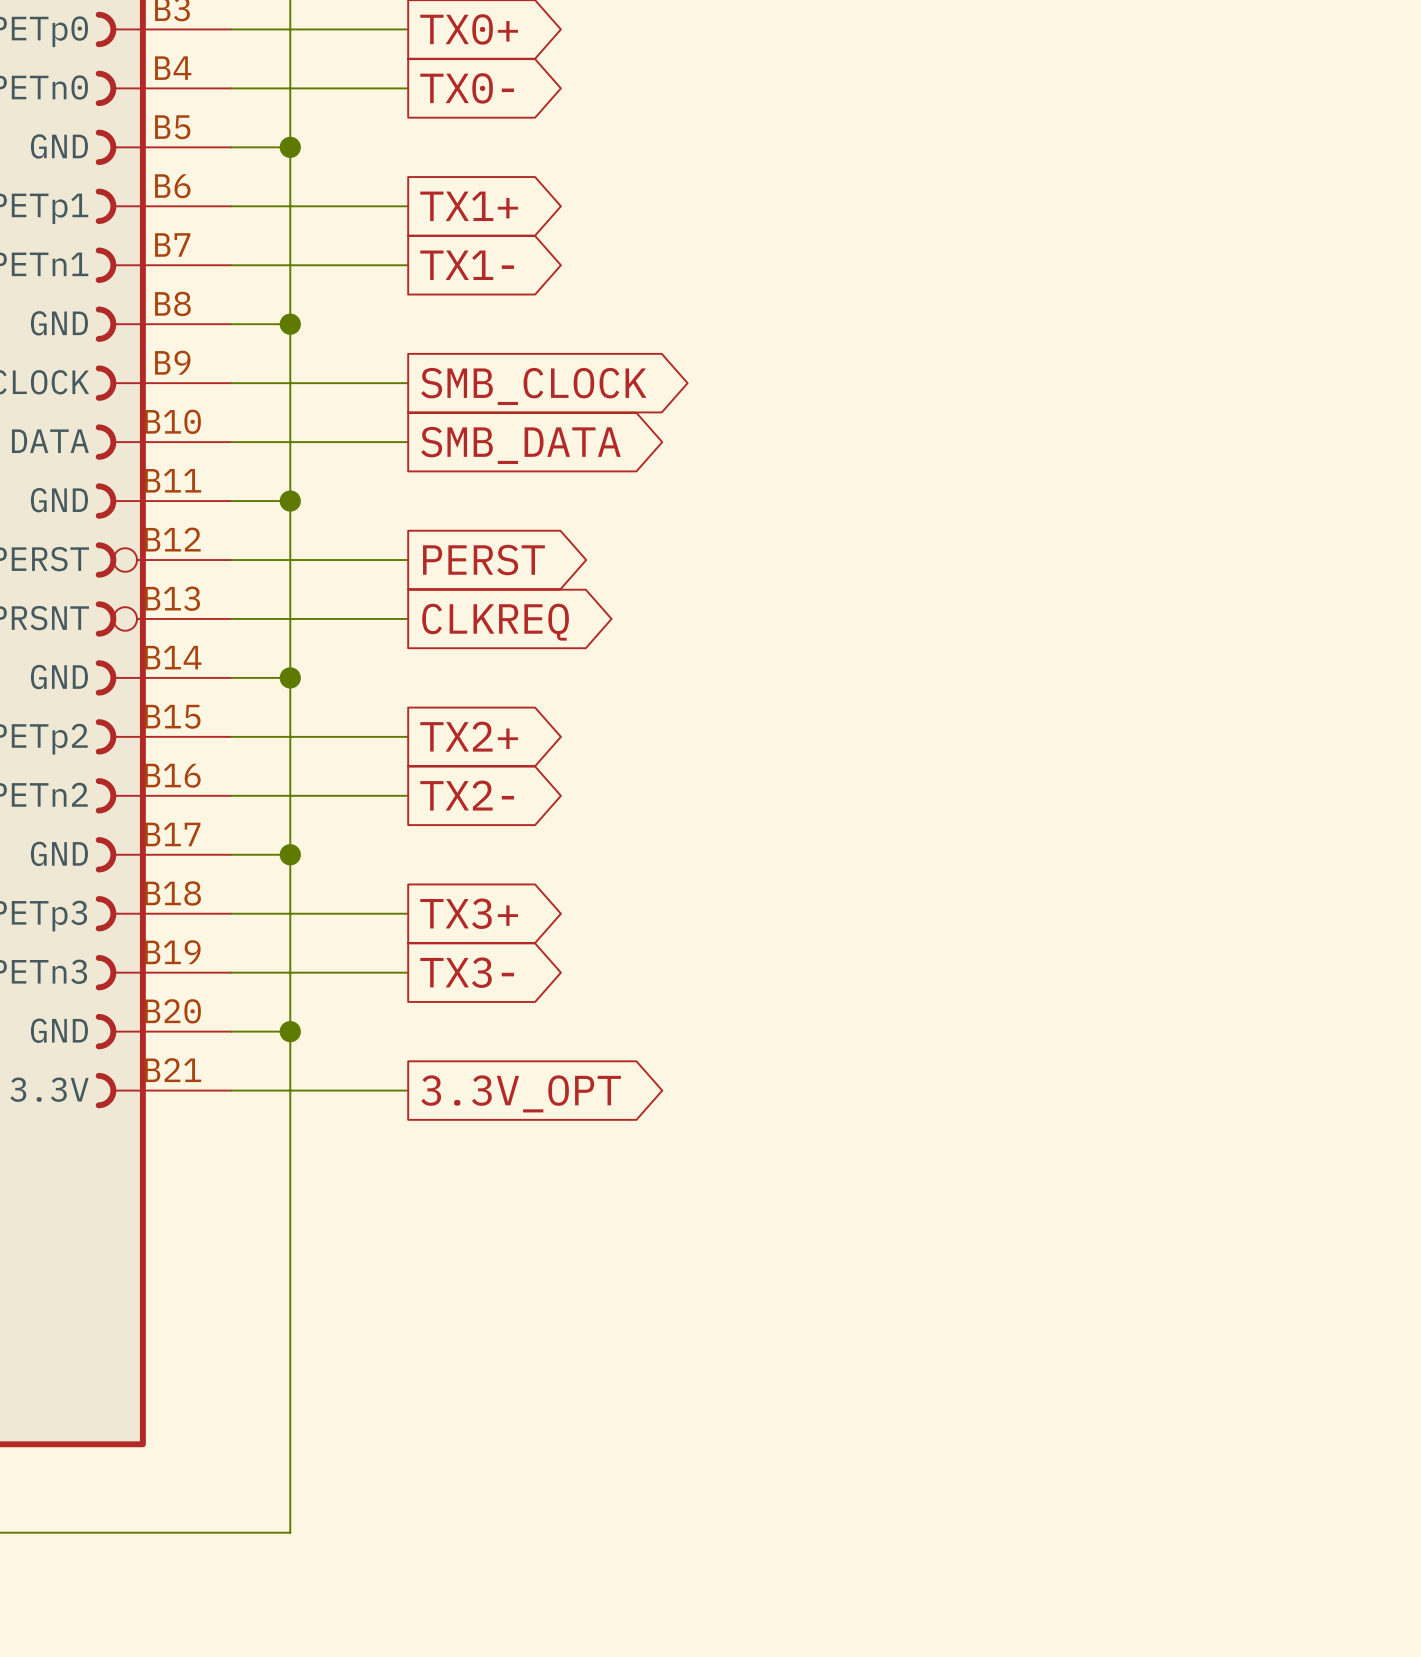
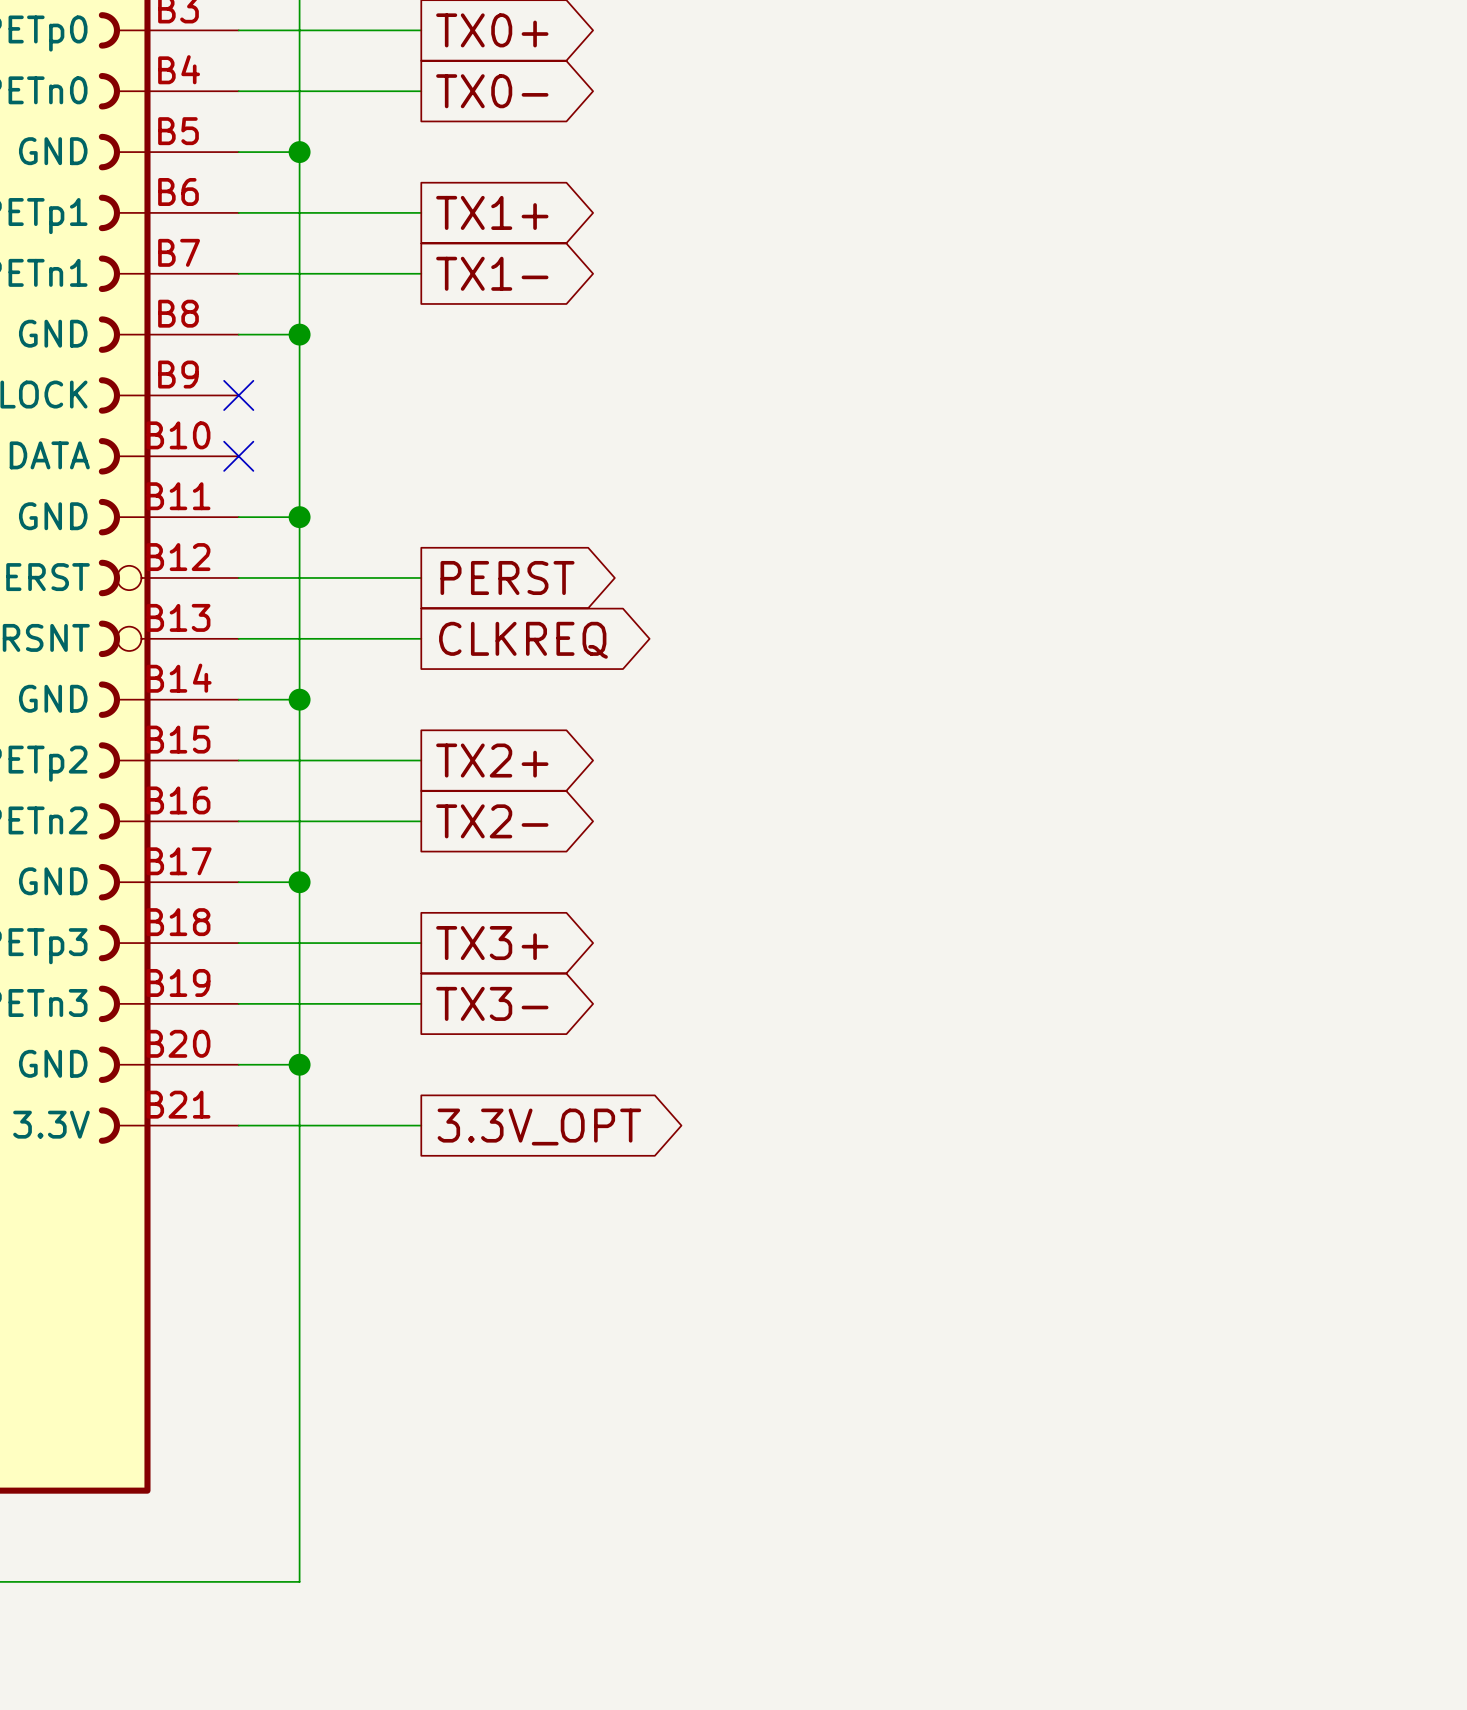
wire: (231, 383) (408, 383) -> none
no-connect mark: none -> (238, 395)
global label: SMB_CLOCK (533, 386) -> none
wire: (231, 442) (408, 442) -> none
no-connect mark: none -> (238, 456)
global label: SMB_DATA (520, 445) -> none

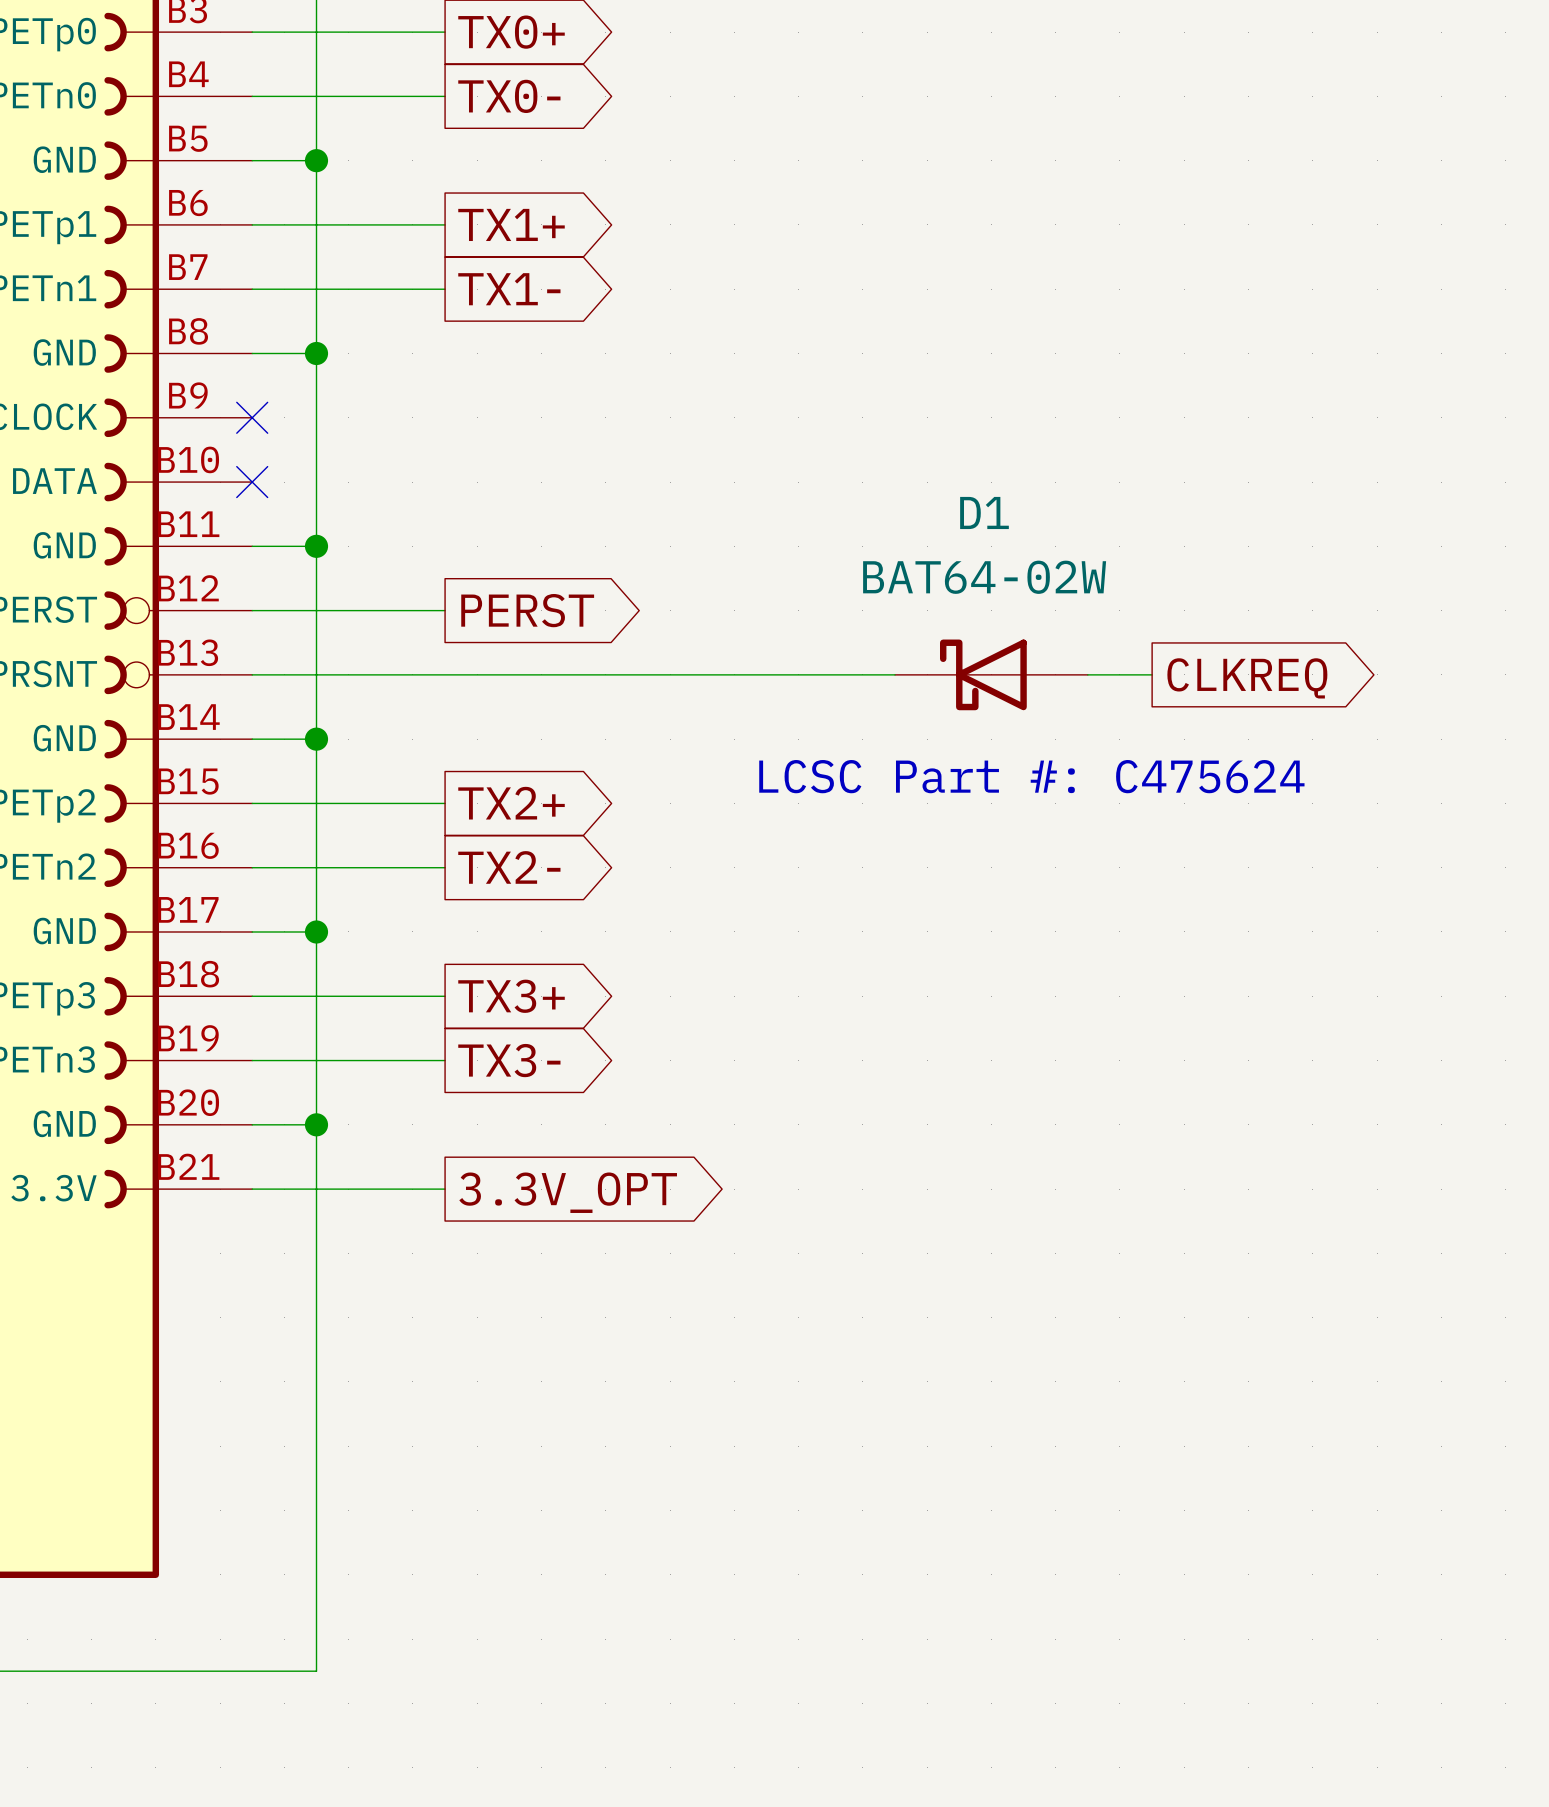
wire: none -> (445, 674) (895, 674)
D1: none -> BAT64-02W (991, 674)
wire: none -> (1087, 674) (1152, 674)
global label: CLKREQ (523, 640) -> none
global label: none -> CLKREQ (1247, 678)
text: none -> LCSC Part #: C475624 (1031, 776)

